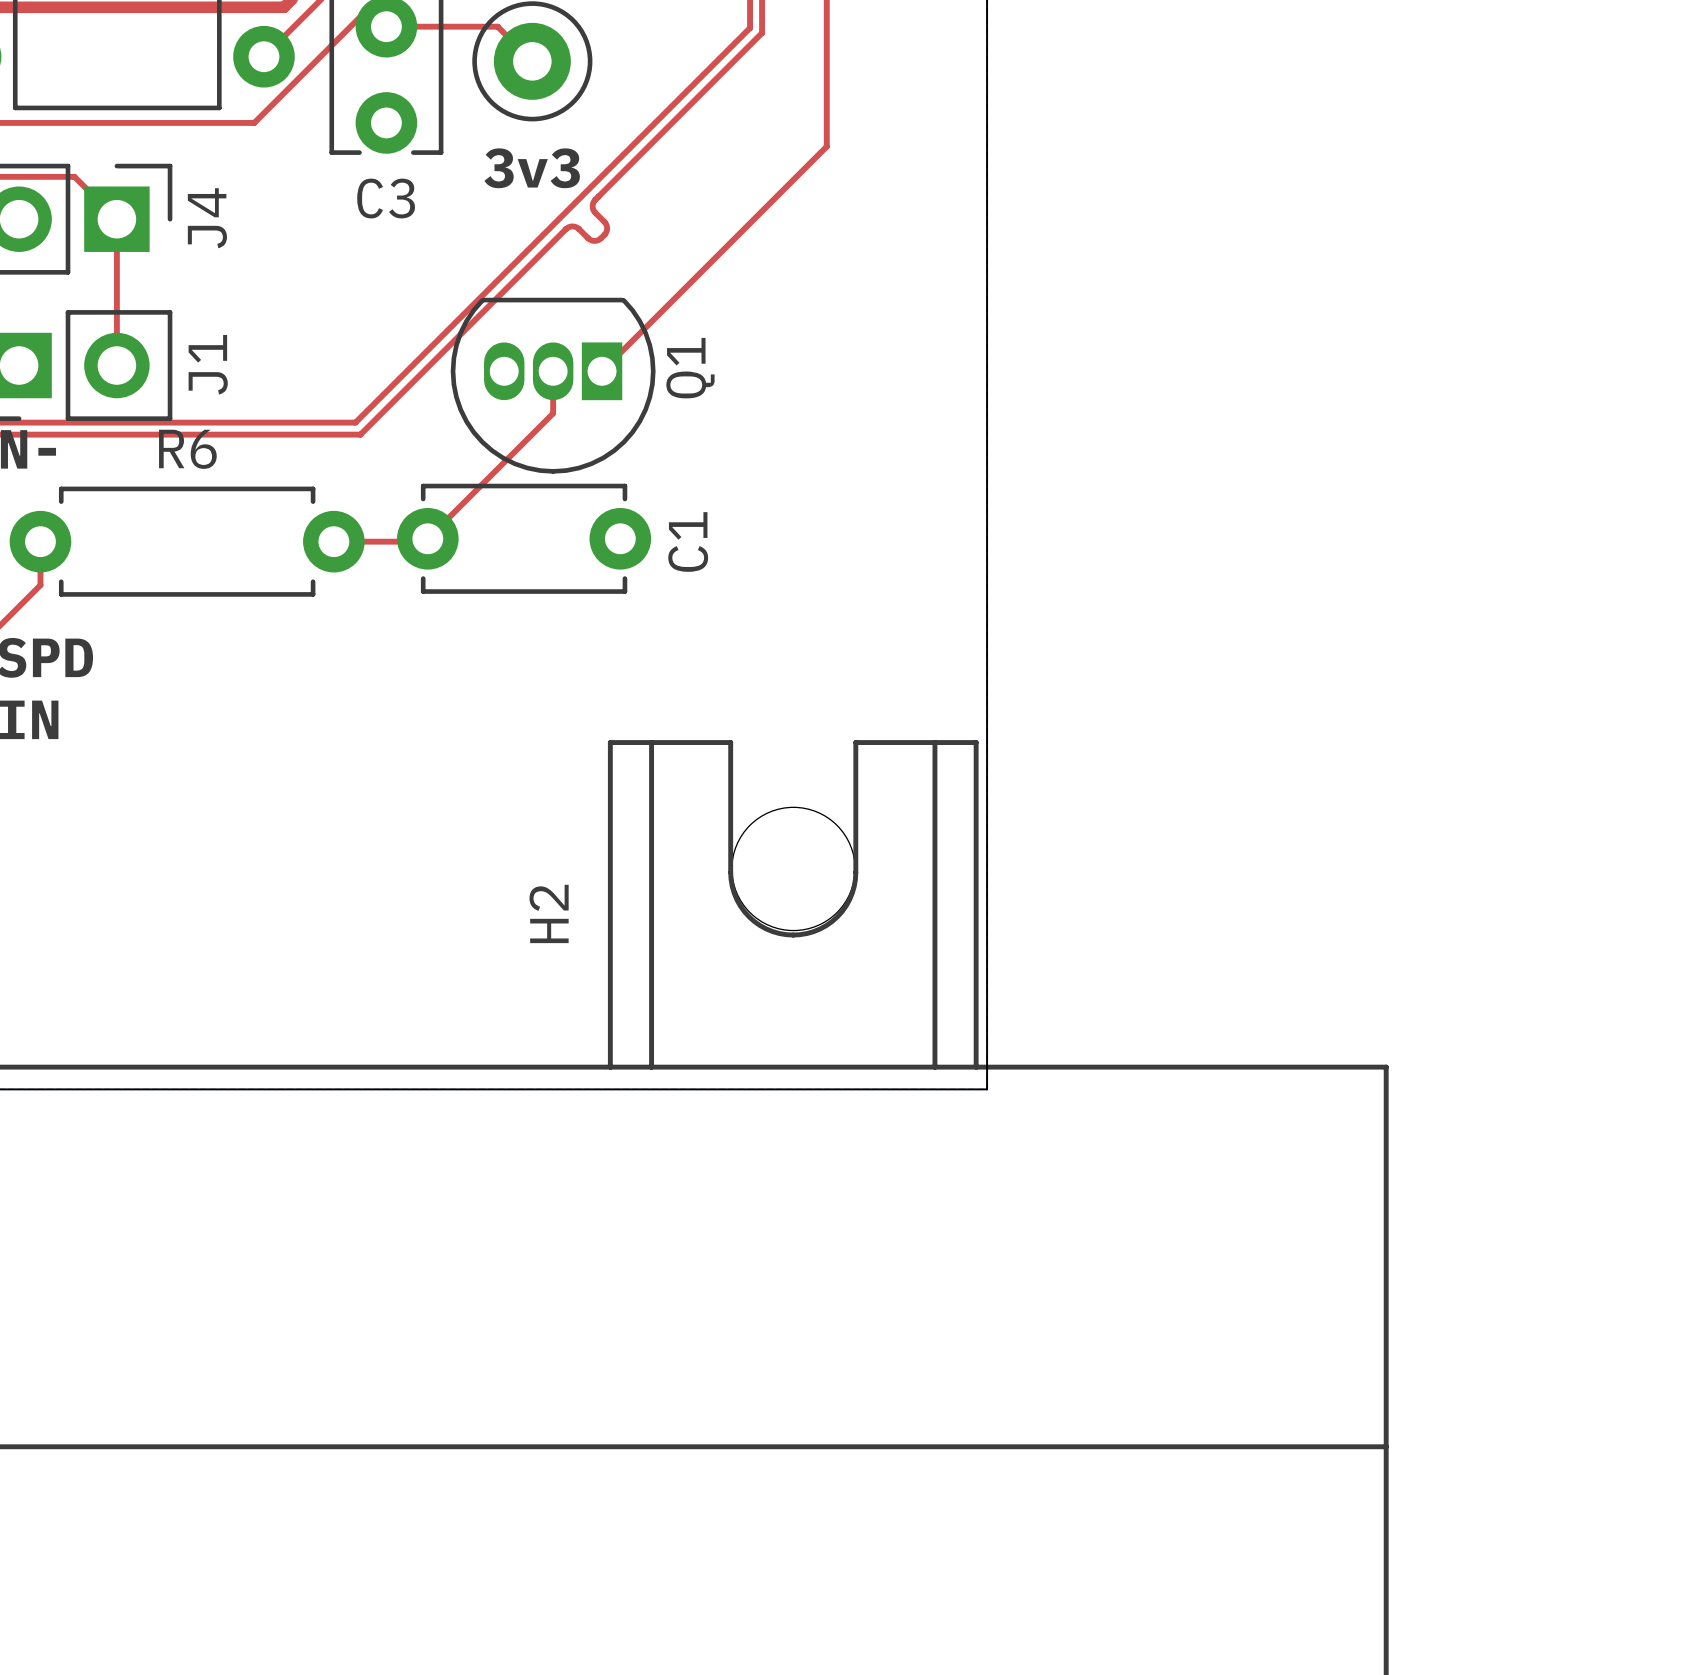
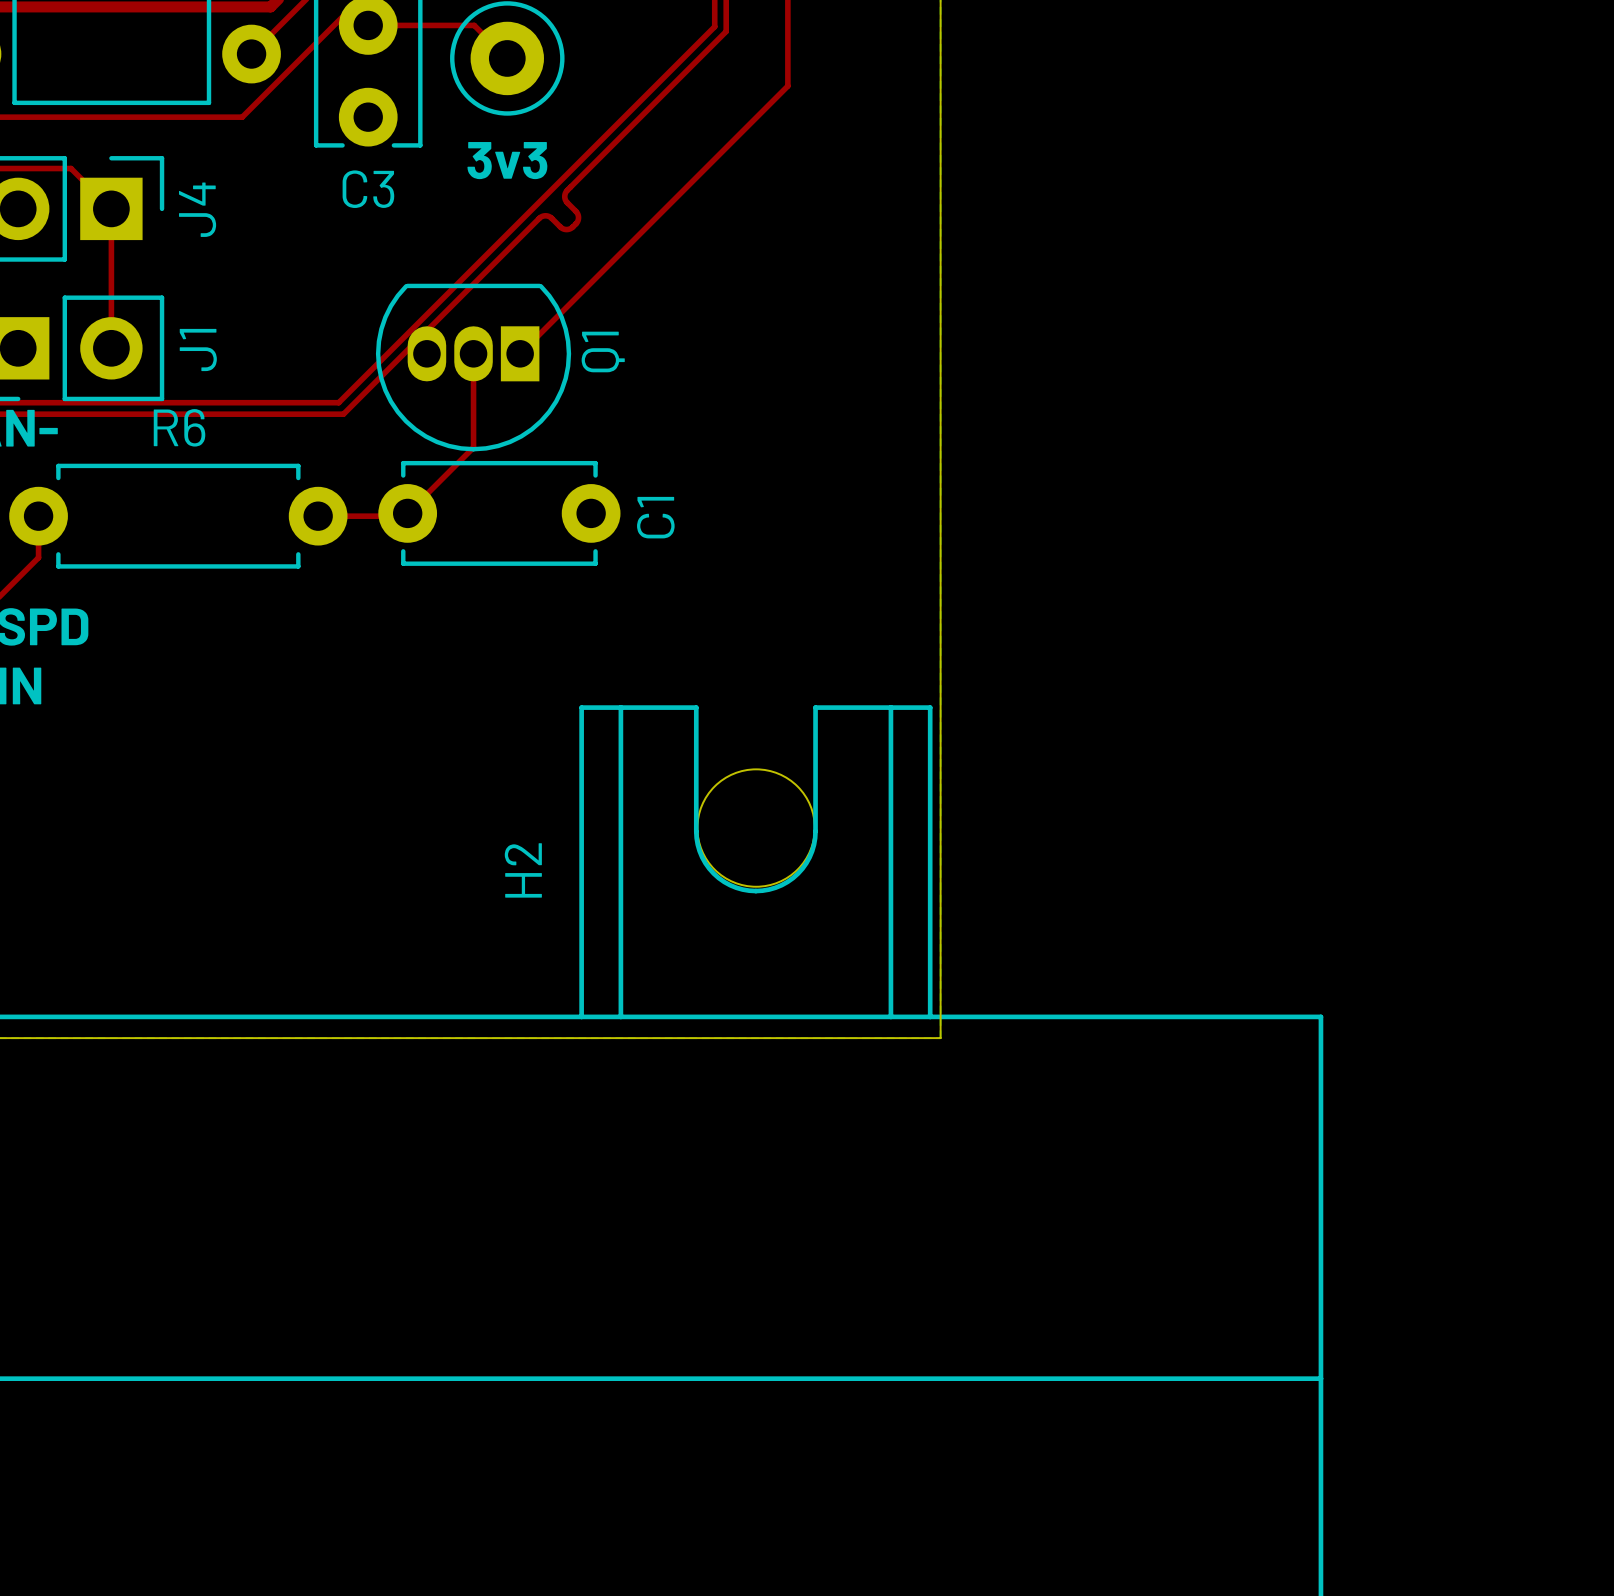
top track: (826, 90) (826, 146) (602, 371) -> (787, 86) (520, 353)
top track: (553, 371) (553, 413) (496, 469) -> (473, 353) (473, 447)
Q1 position: (553, 385) -> (473, 367)

